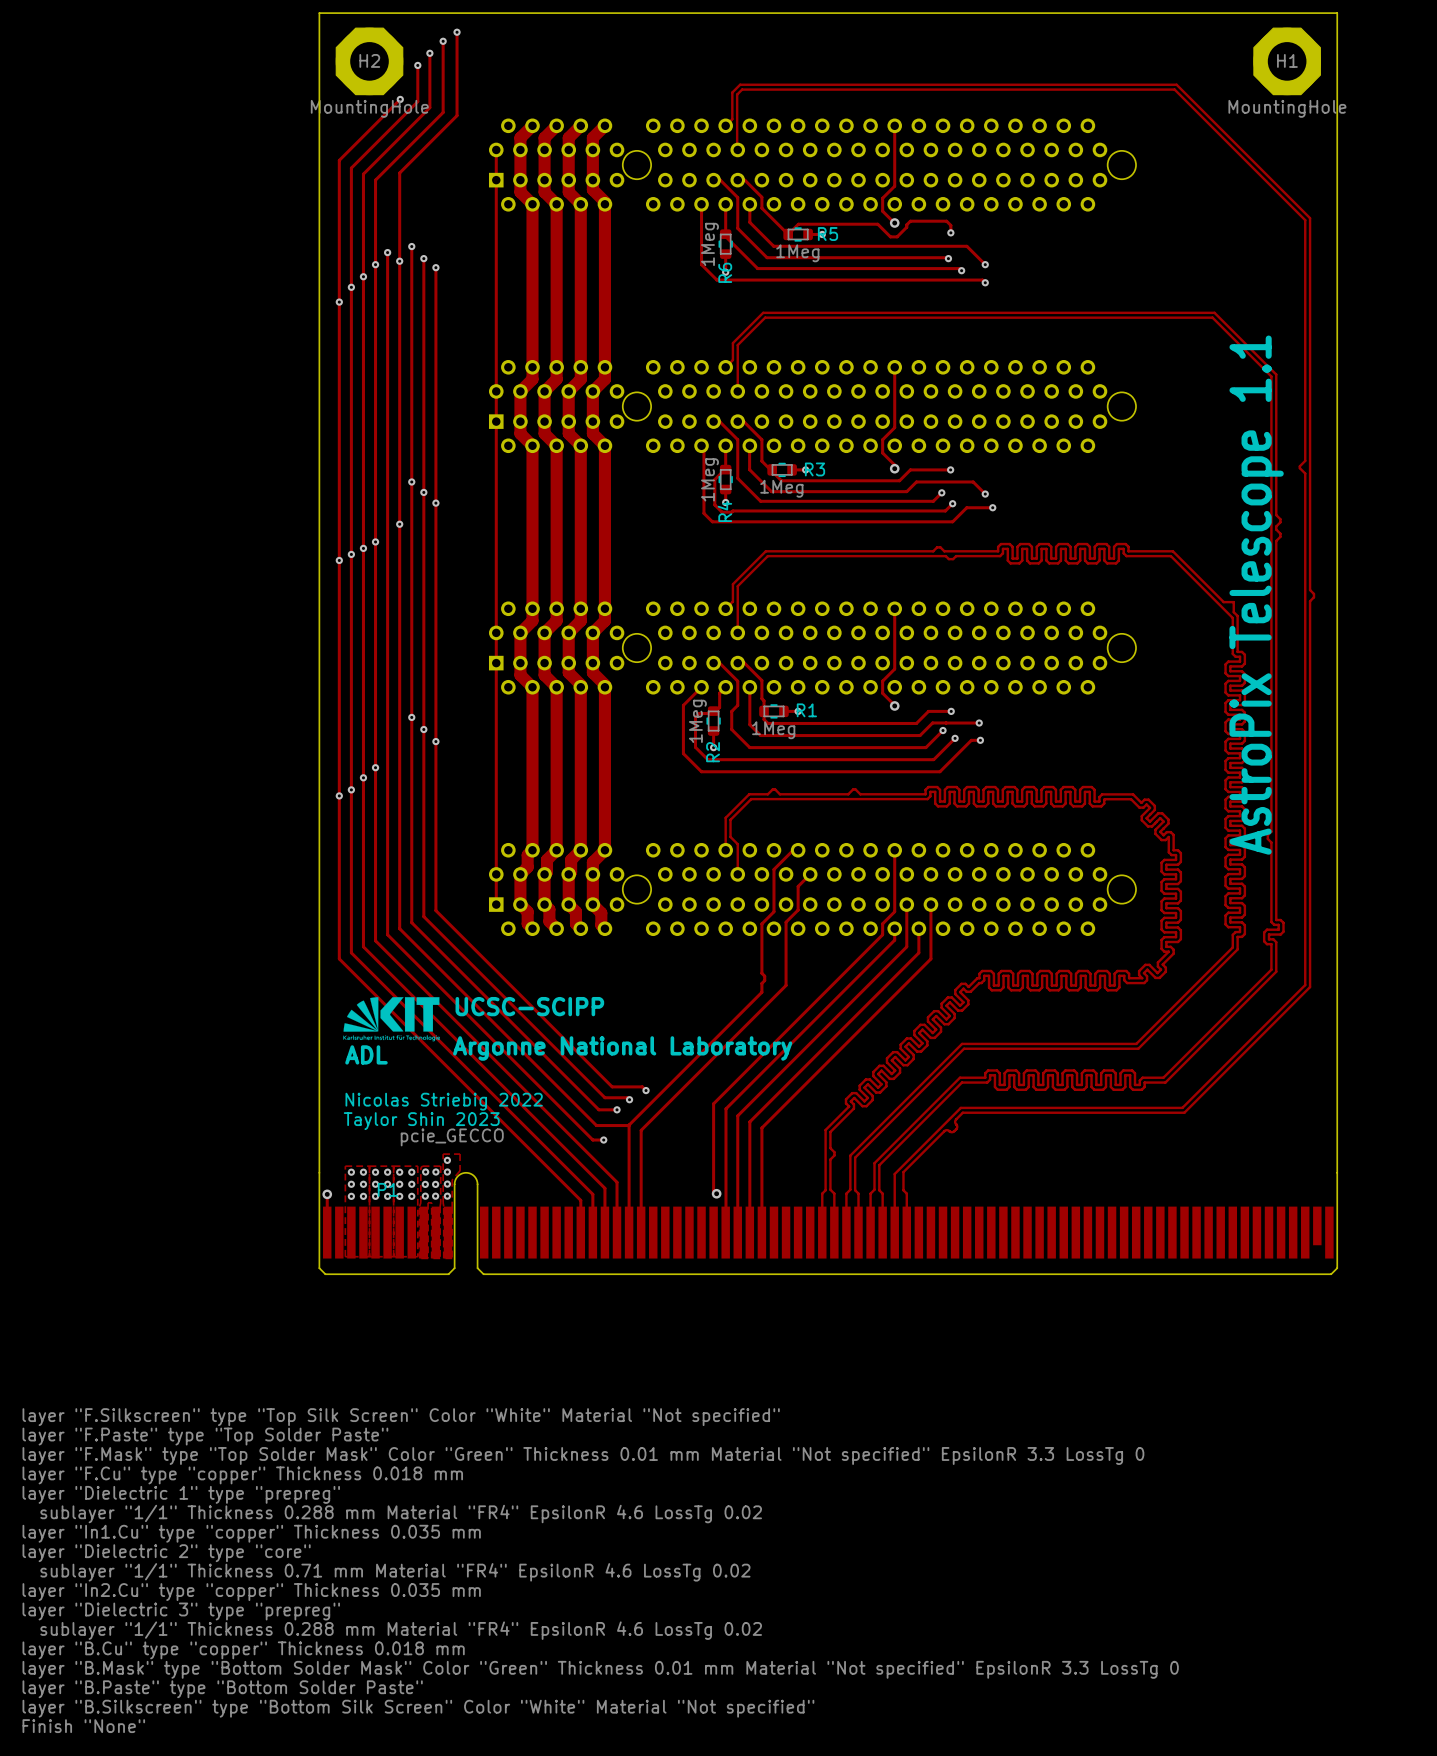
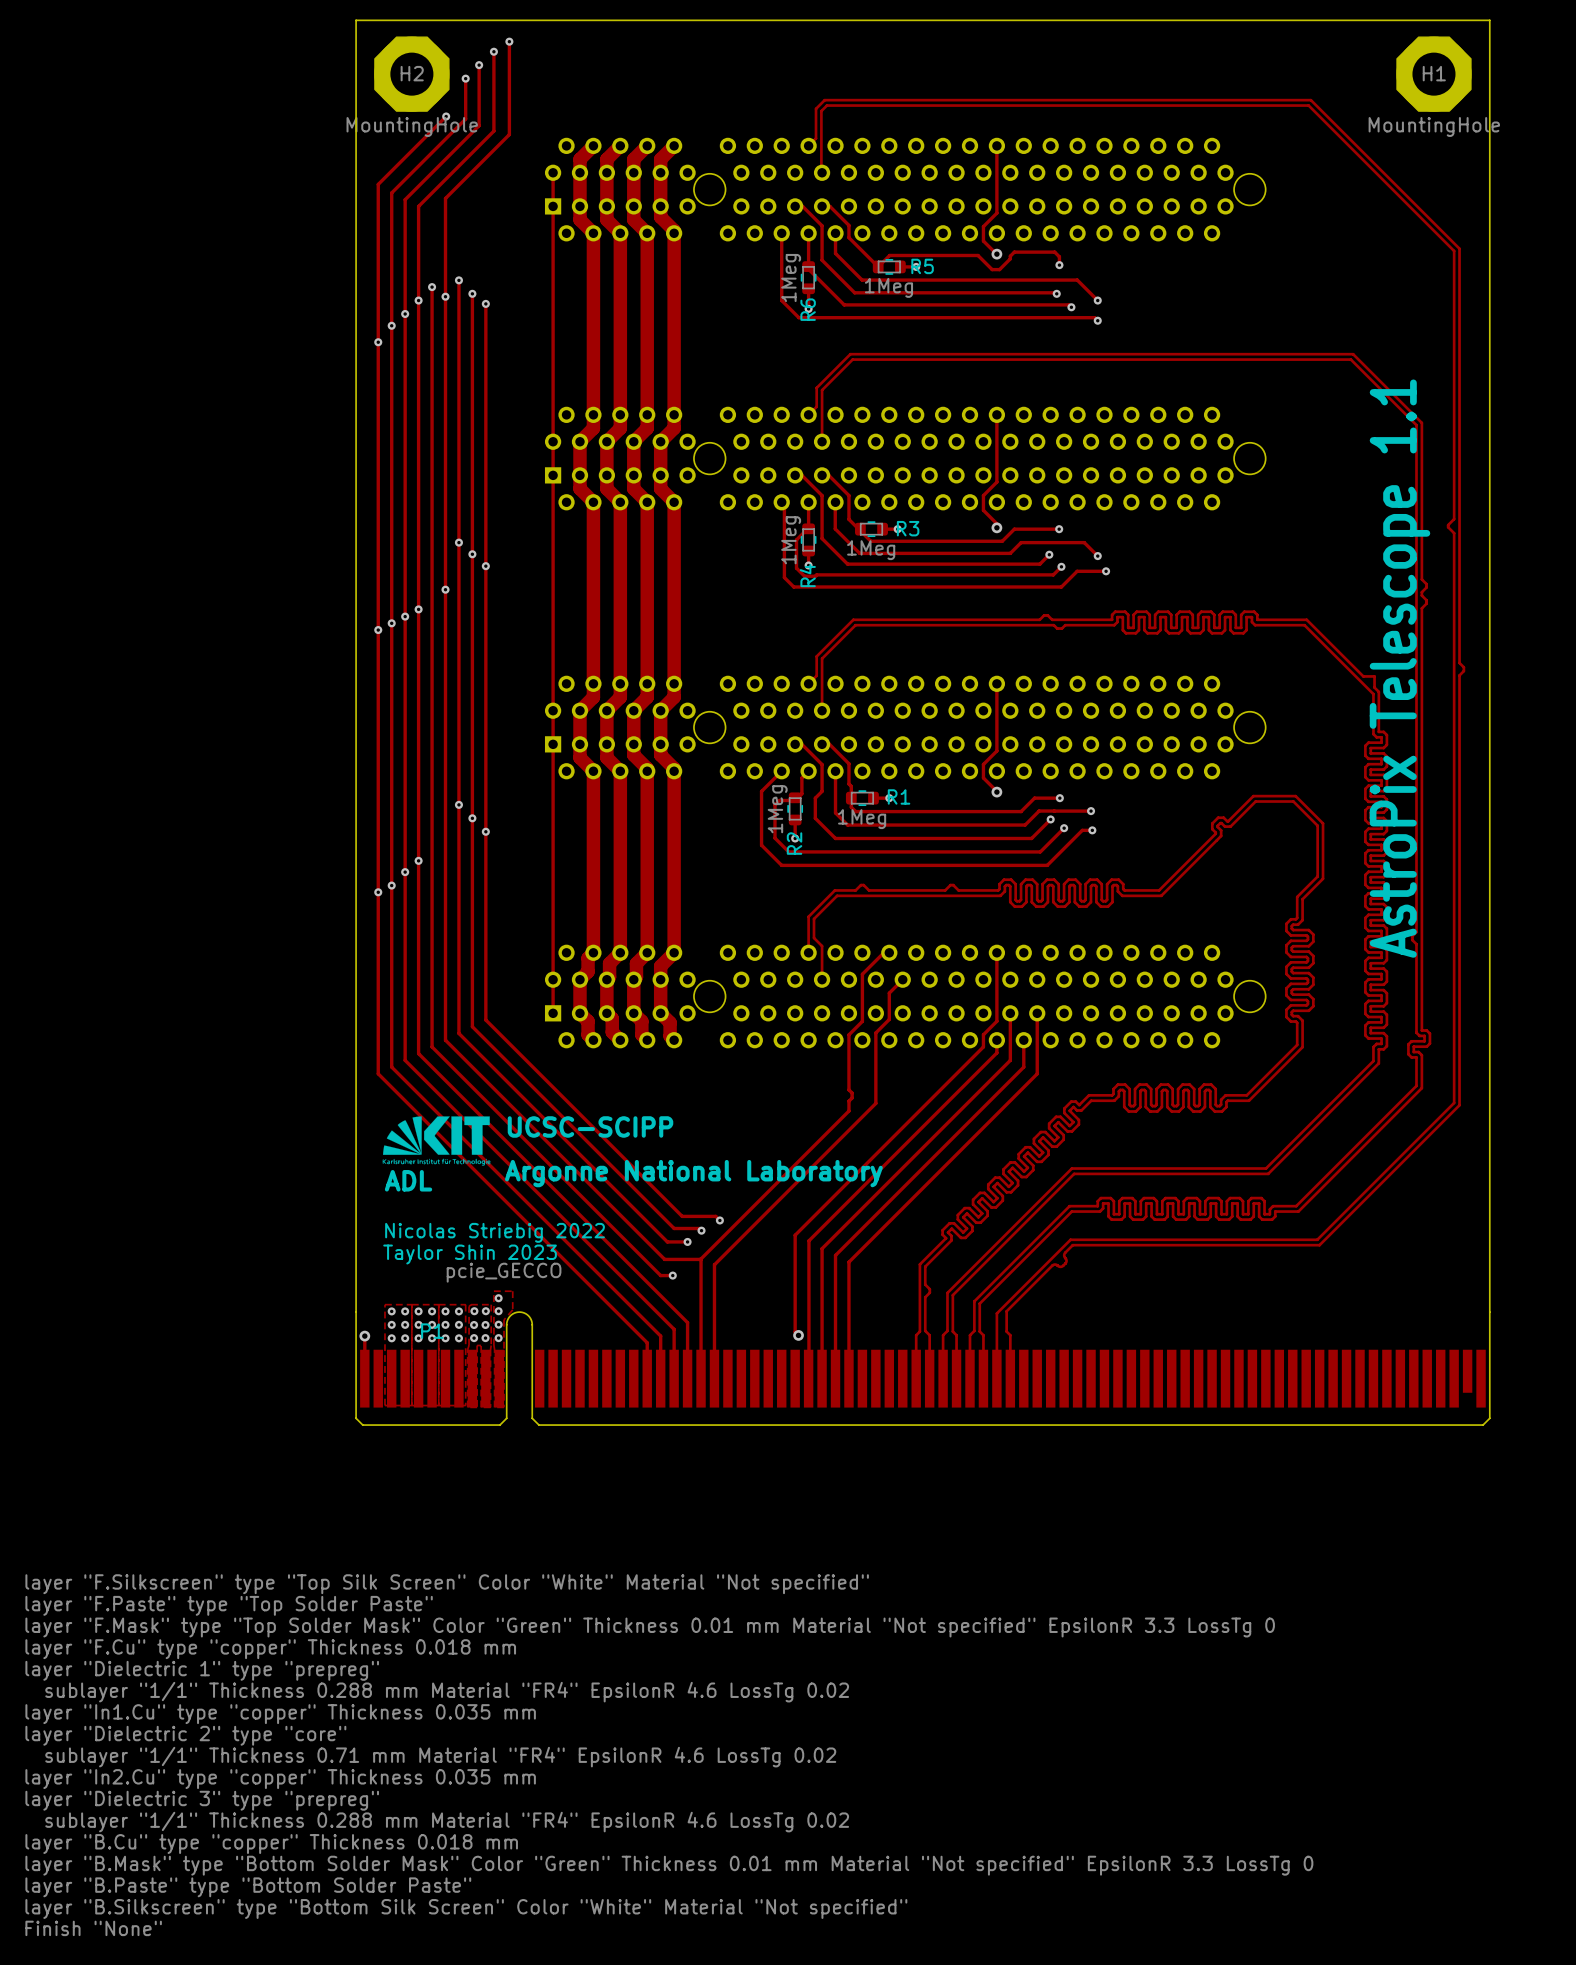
track: (895, 794) (925, 794) (925, 789) (928, 787) (937, 787) (940, 789) (940, 801) (944, 801) (944, 789) (947, 787) (956, 787) (959, 789) (959, 801) (964, 801) (964, 789) (967, 787) (975, 787) (978, 789) (978, 801) (983, 801) (983, 789) (986, 787) (995, 787) (997, 789) (997, 801) (1002, 801) (1002, 789) (1005, 787) (1014, 787) (1017, 789) (1017, 801) (1022, 801) (1022, 789) (1024, 787) (1033, 787) (1036, 789) (1036, 801) (1041, 801) (1041, 789) (1044, 787) (1053, 787) (1055, 789) (1055, 801) (1060, 801) (1060, 789) (1063, 787) (1072, 787) (1075, 789) (1075, 801) (1080, 801) (1080, 789) (1082, 787) (1091, 787) (1094, 789) (1094, 801) (1099, 801) (1099, 797) (1102, 794) (1133, 794) (1141, 802) (1144, 799) (1148, 799) (1154, 805) (1154, 809) (1146, 818) (1150, 821) (1158, 813) (1162, 813) (1168, 819) (1168, 823) (1160, 831) (1163, 835) (1166, 832) (1170, 832) (1173, 834) (1173, 850) (1178, 850) (1180, 853) (1180, 861) (1178, 864) (1166, 864) (1166, 869) (1178, 869) (1180, 872) (1180, 881) (1178, 884) (1166, 884) (1166, 888) (1178, 888) (1180, 891) (1180, 900) (1178, 903) (1166, 903) (1166, 908) (1178, 908) (1180, 911) (1180, 919) (1178, 922) (1166, 922) (1166, 927) (1178, 927) (1180, 930) (1180, 939) (1178, 942) (1166, 942) (1166, 946) (1170, 946) (1173, 949) (1173, 953) (1162, 964) (1165, 967) (1165, 971) (1159, 977) (1155, 977) (1147, 969) (1143, 973) (1147, 976) (1147, 980) (1144, 983) (1127, 983) (1124, 980) (1124, 975) (1119, 975) (1119, 987) (1116, 990) (1107, 990) (1104, 987) (1104, 975) (1100, 975) (1100, 987) (1097, 990) (1088, 990) (1085, 987) (1085, 975) (1080, 975) (1080, 987) (1077, 990) (1069, 990) (1066, 987) (1066, 975) (1061, 975) (1061, 987) (1058, 990) (1049, 990) (1047, 987) (1047, 975) (1042, 975) (1042, 987) (1039, 990) (1030, 990) (1027, 987) (1027, 975) (1022, 975) (1022, 987) (1020, 990) (1011, 990) (1008, 987) (1008, 975) (1003, 975) (1003, 987) (1000, 990) (991, 990) (989, 987) (989, 975) (984, 975) (984, 980) (981, 983) -> (998, 890) (999, 884) (1004, 879) (1011, 879) (1015, 884) (1015, 899) (1019, 901) (1021, 884) (1025, 879) (1032, 879) (1037, 884) (1037, 899) (1041, 901) (1042, 884) (1047, 879) (1054, 879) (1058, 884) (1058, 899) (1062, 901) (1064, 884) (1068, 879) (1075, 879) (1080, 884) (1080, 899) (1084, 901) (1085, 884) (1090, 879) (1097, 879) (1101, 884) (1101, 899) (1105, 901) (1107, 884) (1111, 879) (1118, 879) (1123, 884) (1124, 890) (1159, 890) (1215, 833) (1212, 829) (1212, 823) (1218, 817) (1223, 817) (1228, 821) (1253, 796) (1295, 796) (1323, 823) (1323, 878) (1302, 899) (1302, 920) (1298, 924) (1291, 926) (1293, 930) (1308, 930) (1313, 934) (1313, 941) (1308, 946) (1291, 947) (1293, 951) (1308, 951) (1313, 956) (1313, 963) (1308, 967) (1291, 969) (1293, 973) (1308, 973) (1313, 977) (1313, 984) (1308, 989) (1291, 990) (1293, 994) (1308, 994) (1313, 999) (1313, 1006) (1308, 1010) (1291, 1012) (1293, 1016) (1298, 1016) (1302, 1020) (1302, 1047) (1249, 1100) (1227, 1100) (1226, 1107) (1221, 1111) (1214, 1111) (1210, 1107) (1208, 1089) (1204, 1091) (1204, 1107) (1200, 1111) (1193, 1111) (1188, 1107) (1187, 1089) (1183, 1091) (1183, 1107) (1178, 1111) (1171, 1111) (1167, 1107) (1165, 1089) (1161, 1091) (1161, 1107) (1157, 1111) (1150, 1111) (1145, 1107) (1144, 1089) (1140, 1091) (1140, 1107) (1135, 1111) (1128, 1111) (1124, 1107) (1122, 1089) (1118, 1091) (1118, 1096) (1114, 1100) (1093, 1100)
track: (897, 799) (927, 799) (930, 796) (930, 791) (935, 791) (935, 803) (938, 806) (946, 806) (949, 803) (949, 791) (954, 791) (954, 803) (957, 806) (966, 806) (969, 803) (969, 791) (973, 791) (973, 803) (976, 806) (985, 806) (988, 803) (988, 791) (993, 791) (993, 803) (995, 806) (1004, 806) (1007, 803) (1007, 791) (1012, 791) (1012, 803) (1015, 806) (1024, 806) (1026, 803) (1026, 791) (1031, 791) (1031, 803) (1034, 806) (1043, 806) (1046, 803) (1046, 791) (1051, 791) (1051, 803) (1053, 806) (1062, 806) (1065, 803) (1065, 791) (1070, 791) (1070, 803) (1073, 806) (1082, 806) (1084, 803) (1084, 791) (1089, 791) (1089, 803) (1092, 806) (1101, 806) (1104, 799) (1131, 799) (1139, 807) (1143, 807) (1146, 804) (1150, 807) (1141, 816) (1141, 820) (1148, 826) (1152, 826) (1160, 818) (1163, 821) (1155, 829) (1155, 833) (1161, 840) (1165, 840) (1168, 836) (1168, 852) (1171, 855) (1176, 855) (1176, 859) (1164, 859) (1161, 862) (1161, 871) (1164, 874) (1176, 874) (1176, 879) (1164, 879) (1161, 882) (1161, 890) (1164, 893) (1176, 893) (1176, 898) (1164, 898) (1161, 901) (1161, 910) (1164, 913) (1176, 913) (1176, 917) (1164, 917) (1161, 920) (1161, 929) (1164, 932) (1176, 932) (1176, 937) (1164, 937) (1161, 940) (1161, 948) (1164, 951) (1168, 951) (1157, 962) (1157, 966) (1161, 969) (1157, 973) (1149, 964) (1145, 964) (1139, 971) (1139, 975) (1142, 978) (1129, 978) (1129, 973) (1126, 970) (1117, 970) (1114, 973) (1114, 985) (1109, 985) (1109, 973) (1106, 970) (1098, 970) (1095, 973) (1095, 985) (1090, 985) (1090, 973) (1087, 970) (1078, 970) (1075, 973) (1075, 985) (1071, 985) (1071, 973) (1068, 970) (1059, 970) (1056, 973) (1056, 985) (1051, 985) (1051, 973) (1049, 970) (1040, 970) (1037, 973) (1037, 985) (1032, 985) (1032, 973) (1029, 970) (1020, 970) (1018, 973) (1018, 985) (1013, 985) (1013, 973) (1010, 970) (1001, 970) (998, 973) (998, 985) (993, 985) (993, 973) (991, 970) (982, 970) (979, 973) (979, 978) -> (1000, 895) (1004, 891) (1004, 886) (1008, 885) (1010, 902) (1014, 906) (1021, 906) (1026, 902) (1026, 886) (1030, 885) (1031, 902) (1036, 906) (1043, 906) (1047, 902) (1047, 886) (1051, 885) (1053, 902) (1057, 906) (1064, 906) (1069, 902) (1069, 886) (1073, 885) (1074, 902) (1079, 906) (1086, 906) (1090, 902) (1090, 886) (1095, 885) (1096, 902) (1100, 906) (1107, 906) (1112, 902) (1113, 885) (1117, 886) (1117, 891) (1122, 895) (1161, 895) (1221, 835) (1221, 830) (1217, 825) (1221, 823) (1224, 826) (1230, 826) (1255, 801) (1293, 801) (1317, 825) (1317, 876) (1297, 896) (1297, 917) (1290, 919) (1286, 923) (1286, 930) (1290, 935) (1307, 936) (1306, 940) (1290, 940) (1286, 945) (1286, 952) (1290, 956) (1307, 958) (1306, 962) (1290, 962) (1286, 966) (1286, 973) (1290, 978) (1307, 979) (1306, 983) (1290, 983) (1286, 988) (1286, 995) (1290, 1000) (1307, 1001) (1306, 1005) (1290, 1005) (1286, 1009) (1286, 1017) (1290, 1021) (1297, 1022) (1297, 1044) (1246, 1095) (1225, 1095) (1221, 1099) (1219, 1106) (1215, 1104) (1215, 1089) (1211, 1084) (1204, 1084) (1199, 1089) (1198, 1106) (1194, 1104) (1194, 1089) (1189, 1084) (1182, 1084) (1178, 1089) (1176, 1106) (1172, 1104) (1172, 1089) (1168, 1084) (1161, 1084) (1156, 1089) (1155, 1106) (1151, 1104) (1151, 1089) (1146, 1084) (1139, 1084) (1135, 1089) (1133, 1106) (1129, 1104) (1129, 1089) (1125, 1084) (1117, 1084) (1113, 1089) (1112, 1095) (1091, 1095)

